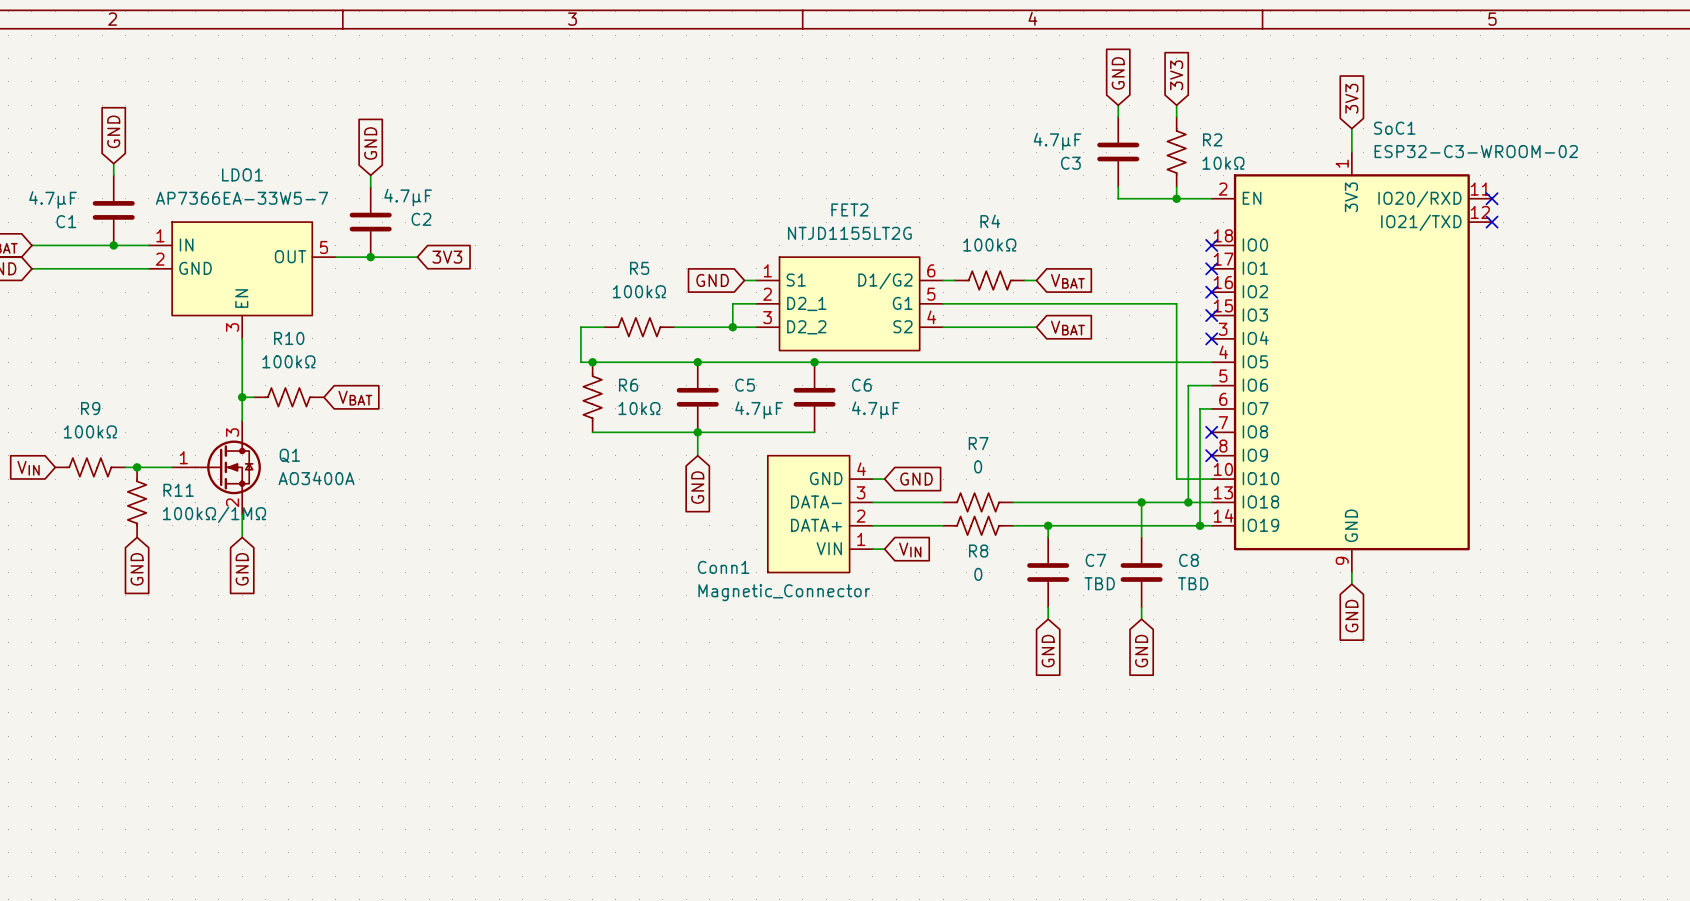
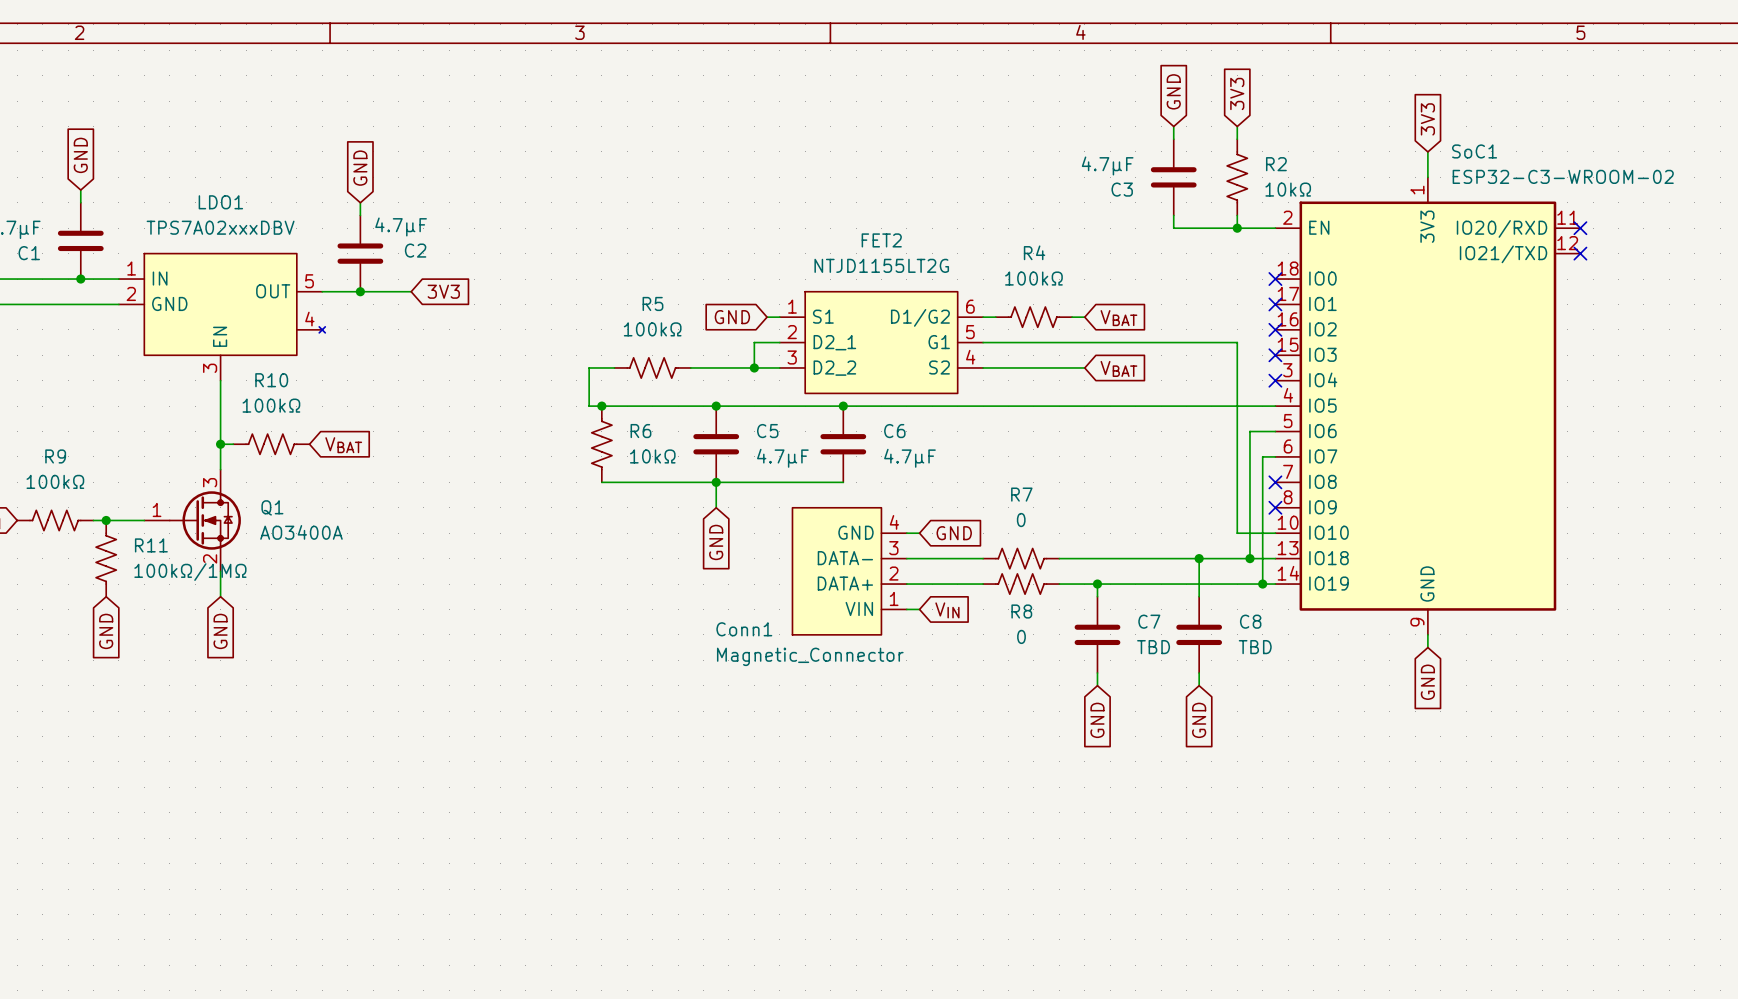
LDO1 value: AP7366EA-33W5-7 (241, 198) -> TPS7A02xxxDBV (220, 227)
LDO1 symbol: [148, 222, 336, 339] -> [118, 253, 326, 381]

